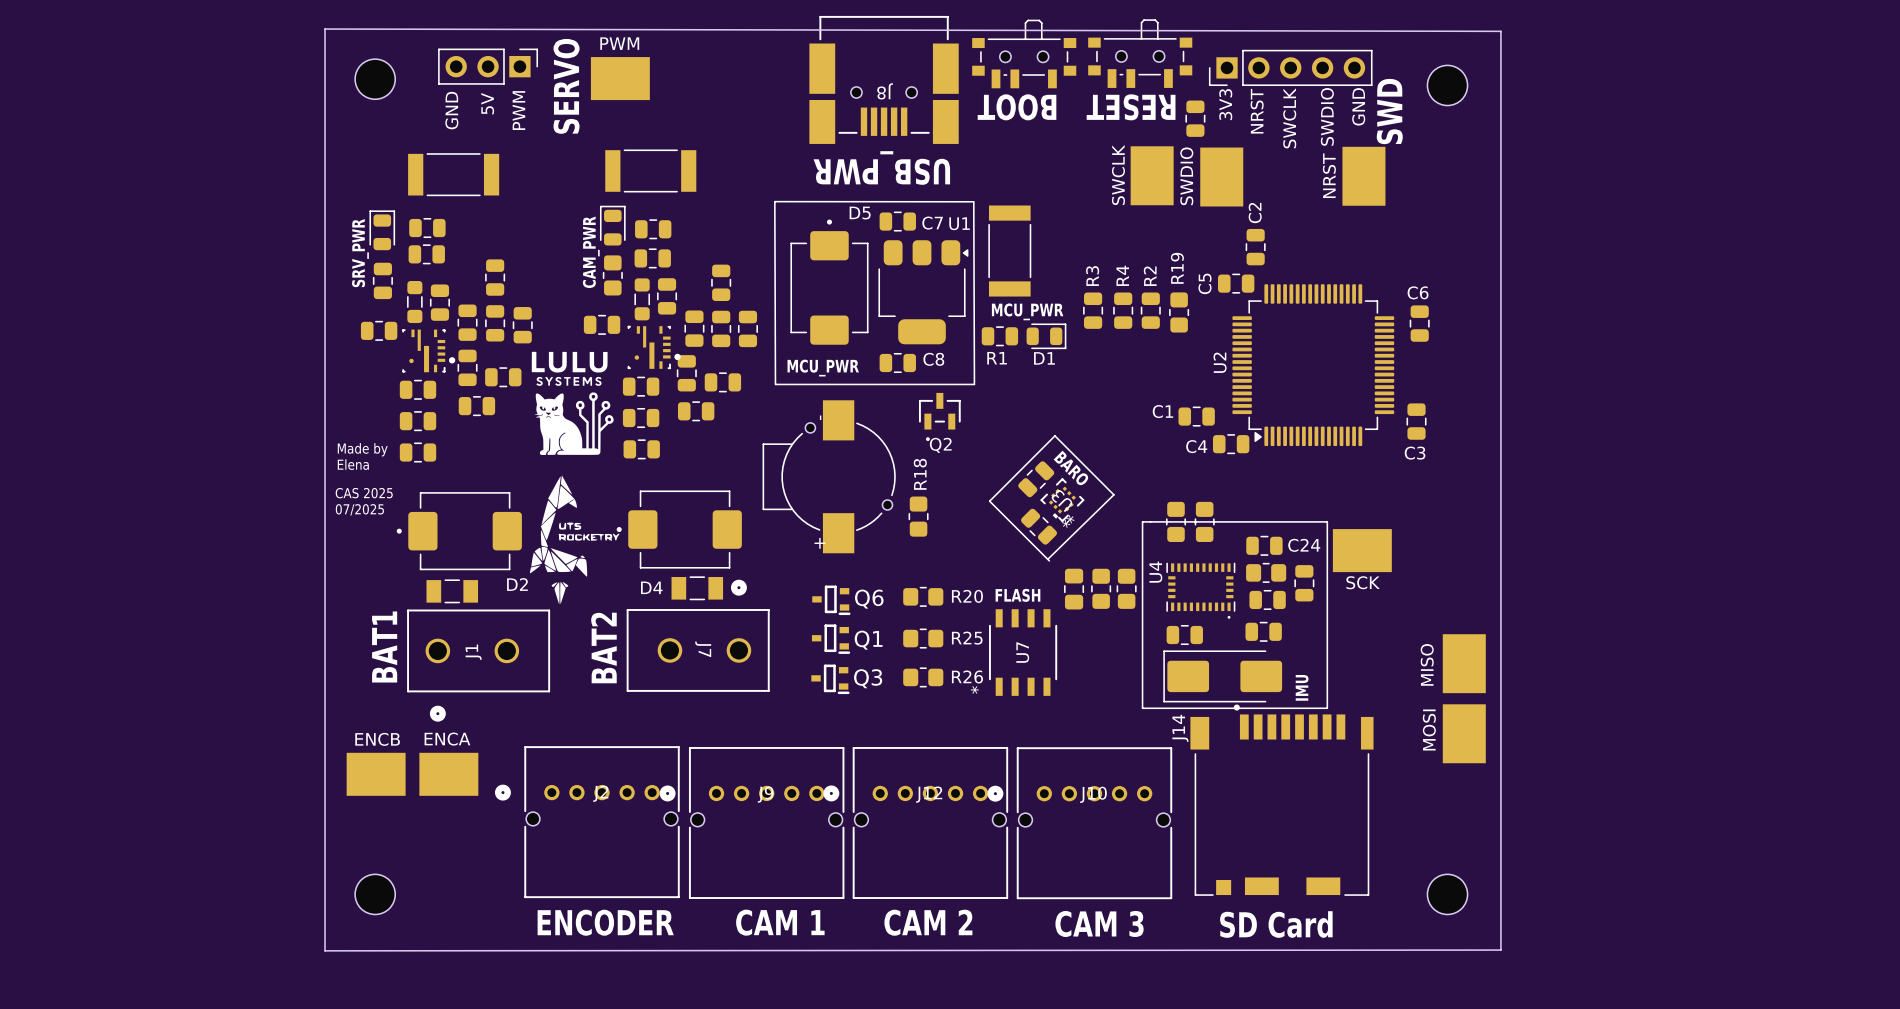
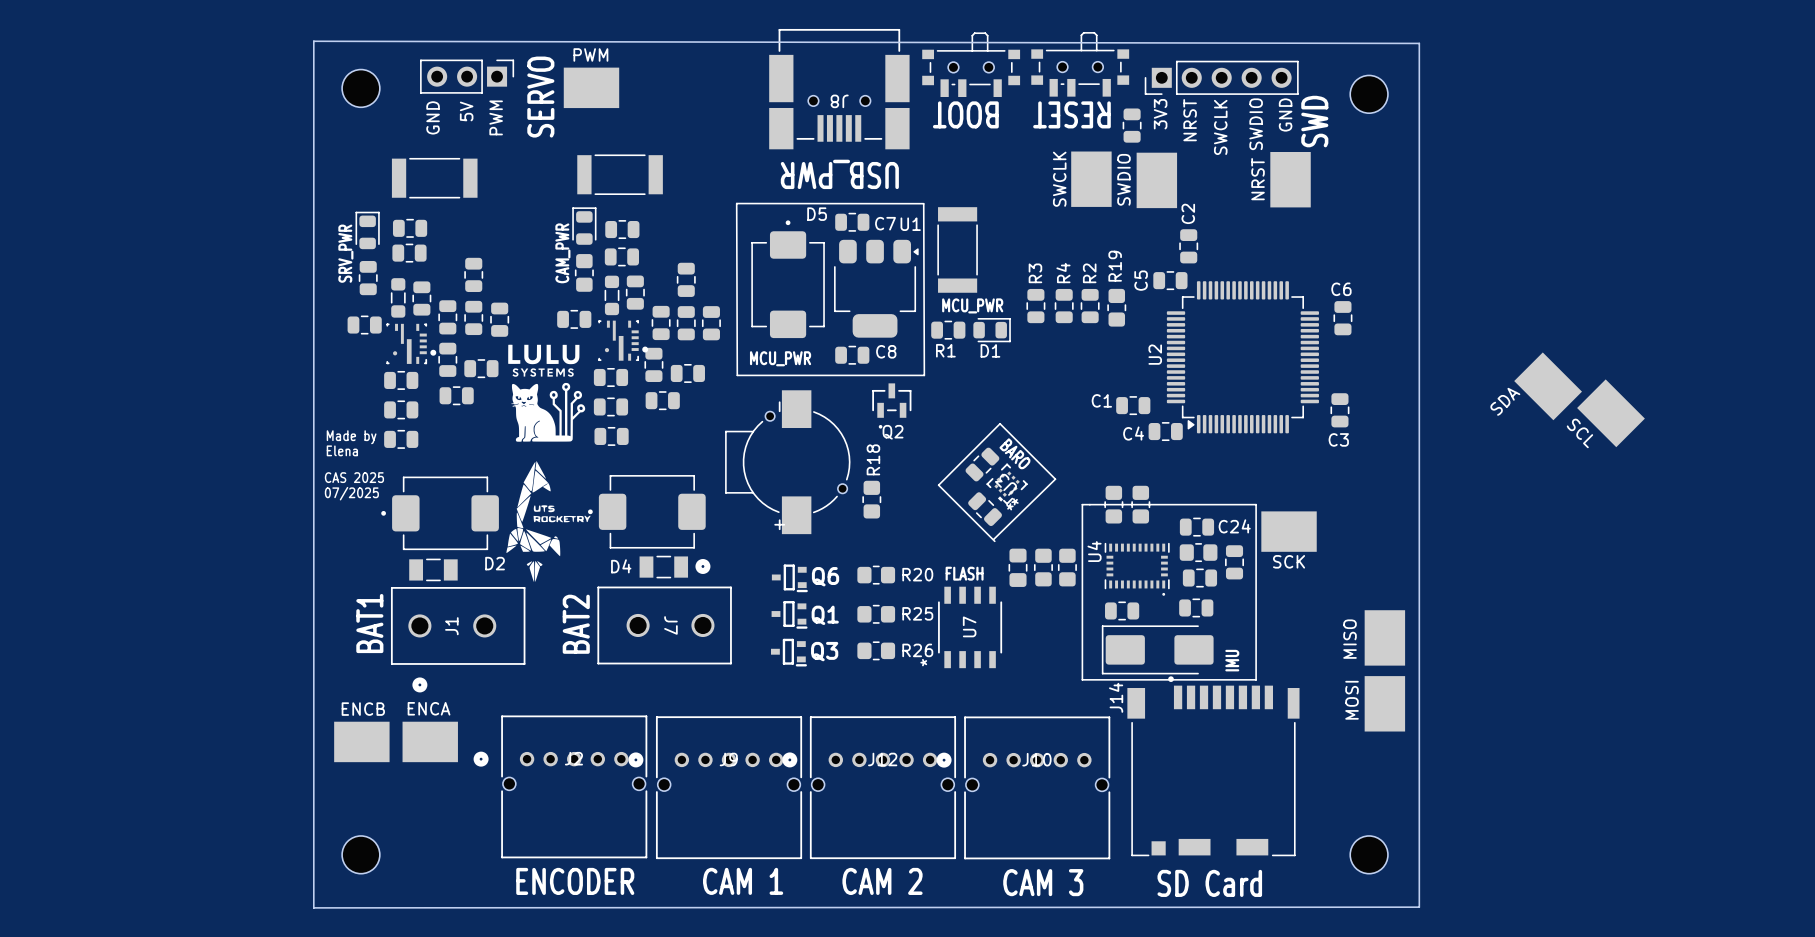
SDA: none -> (1548, 386)
SCL: none -> (1610, 413)

